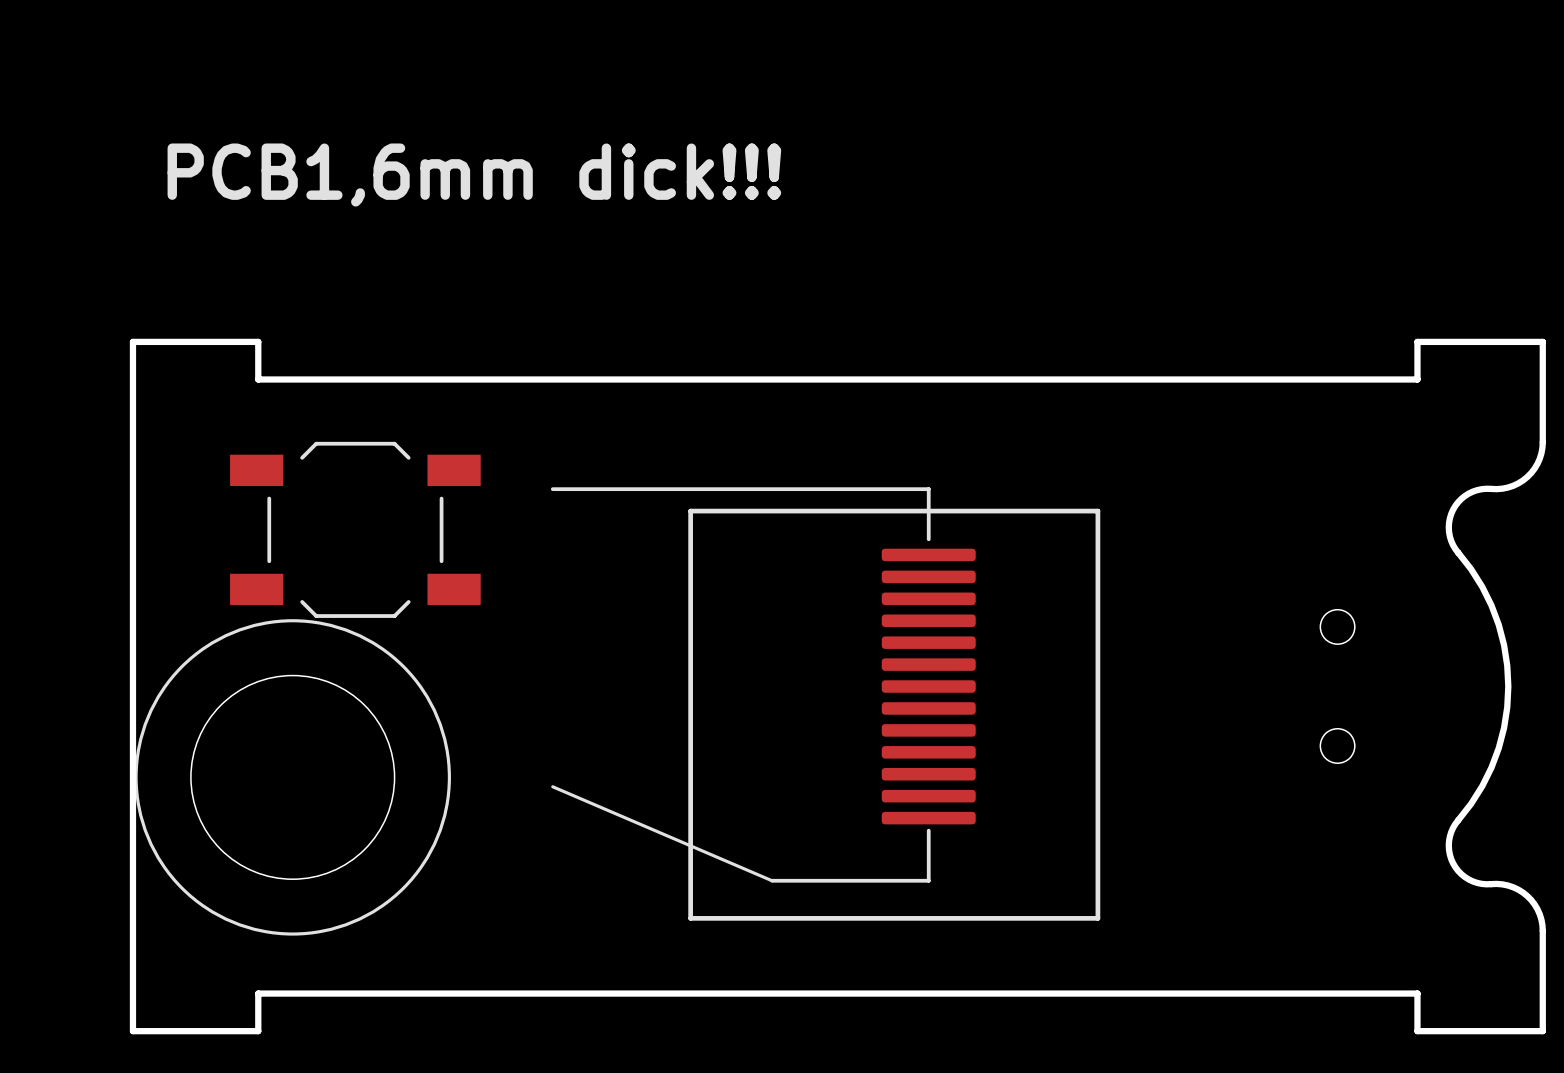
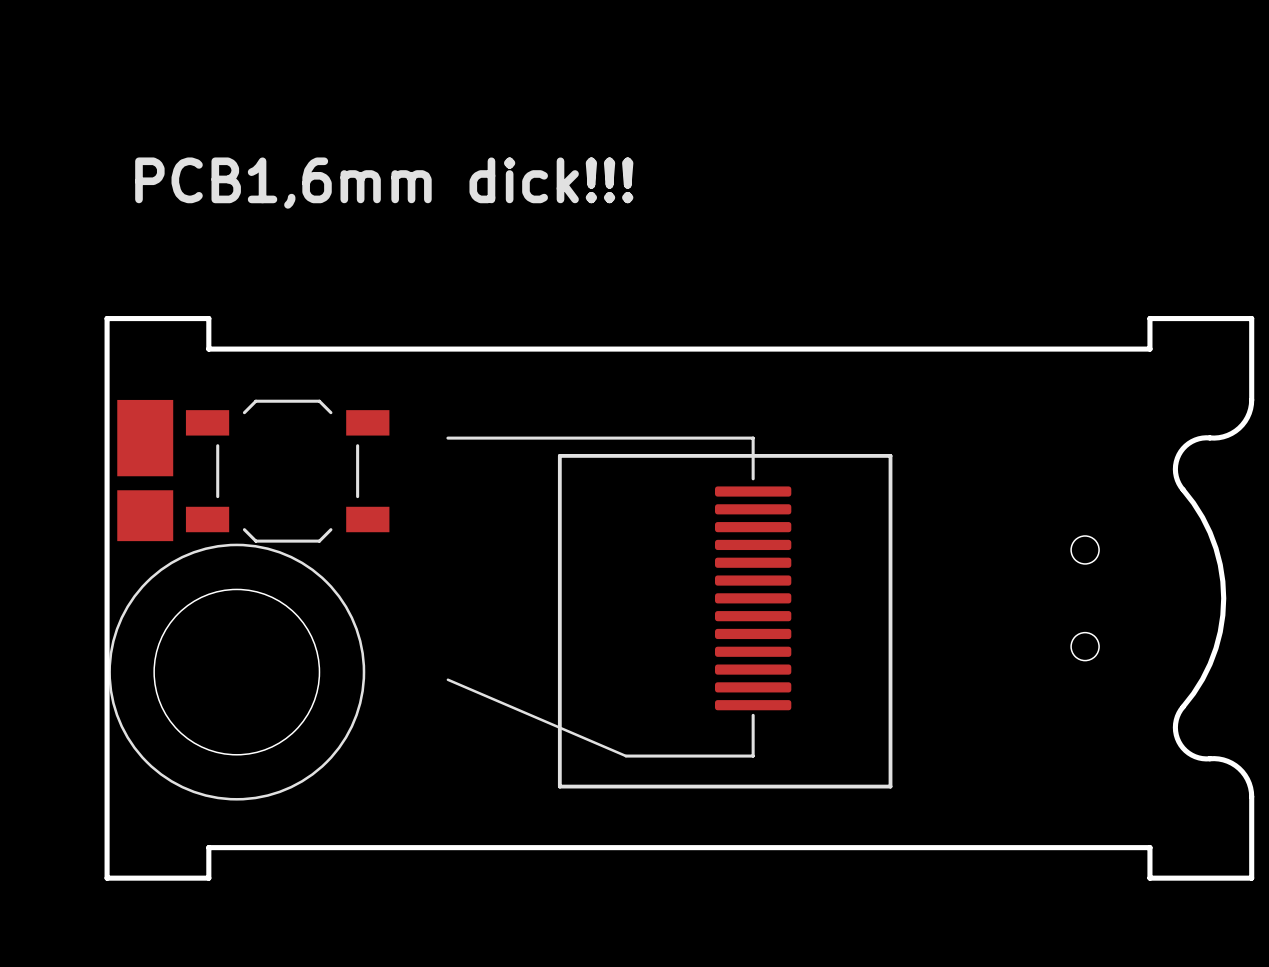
part: none -> (145, 470)

